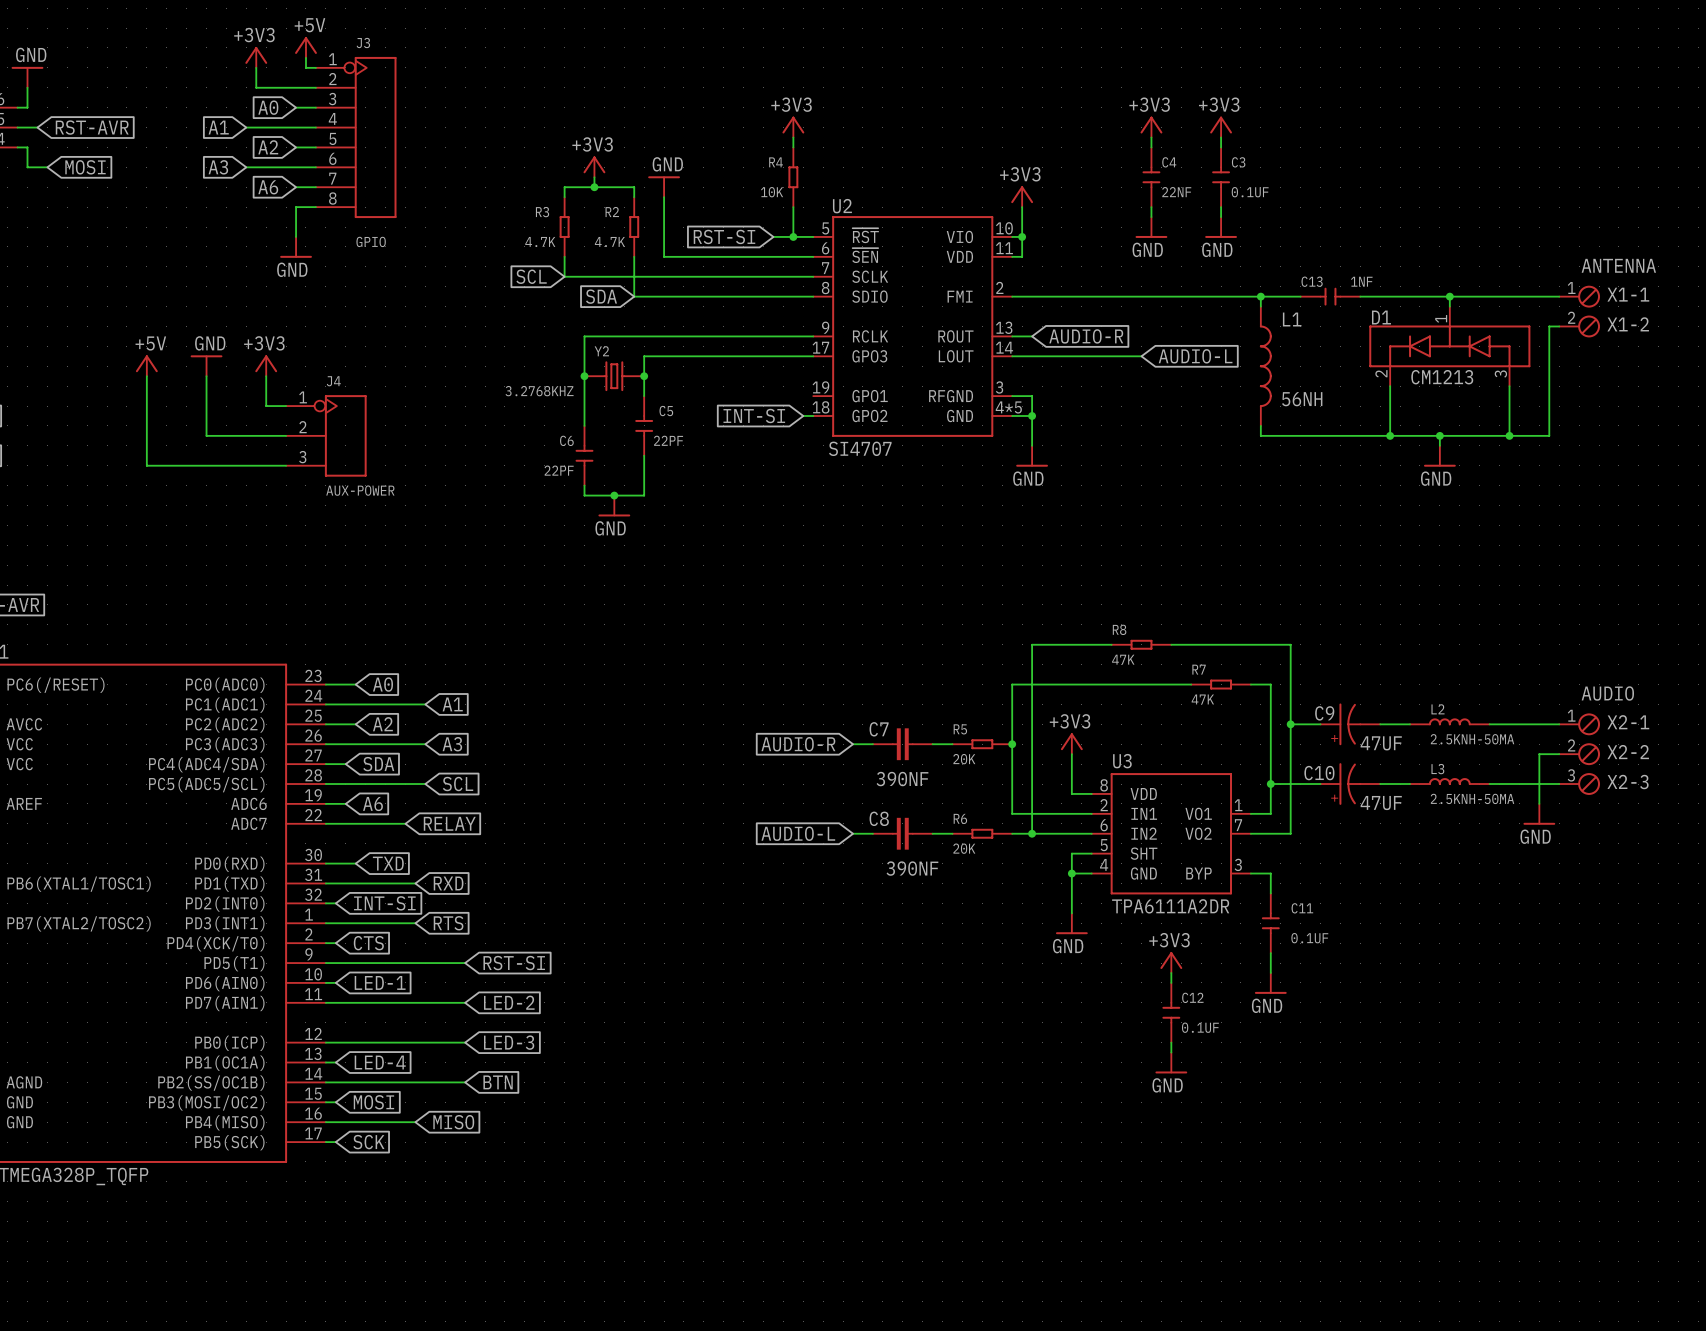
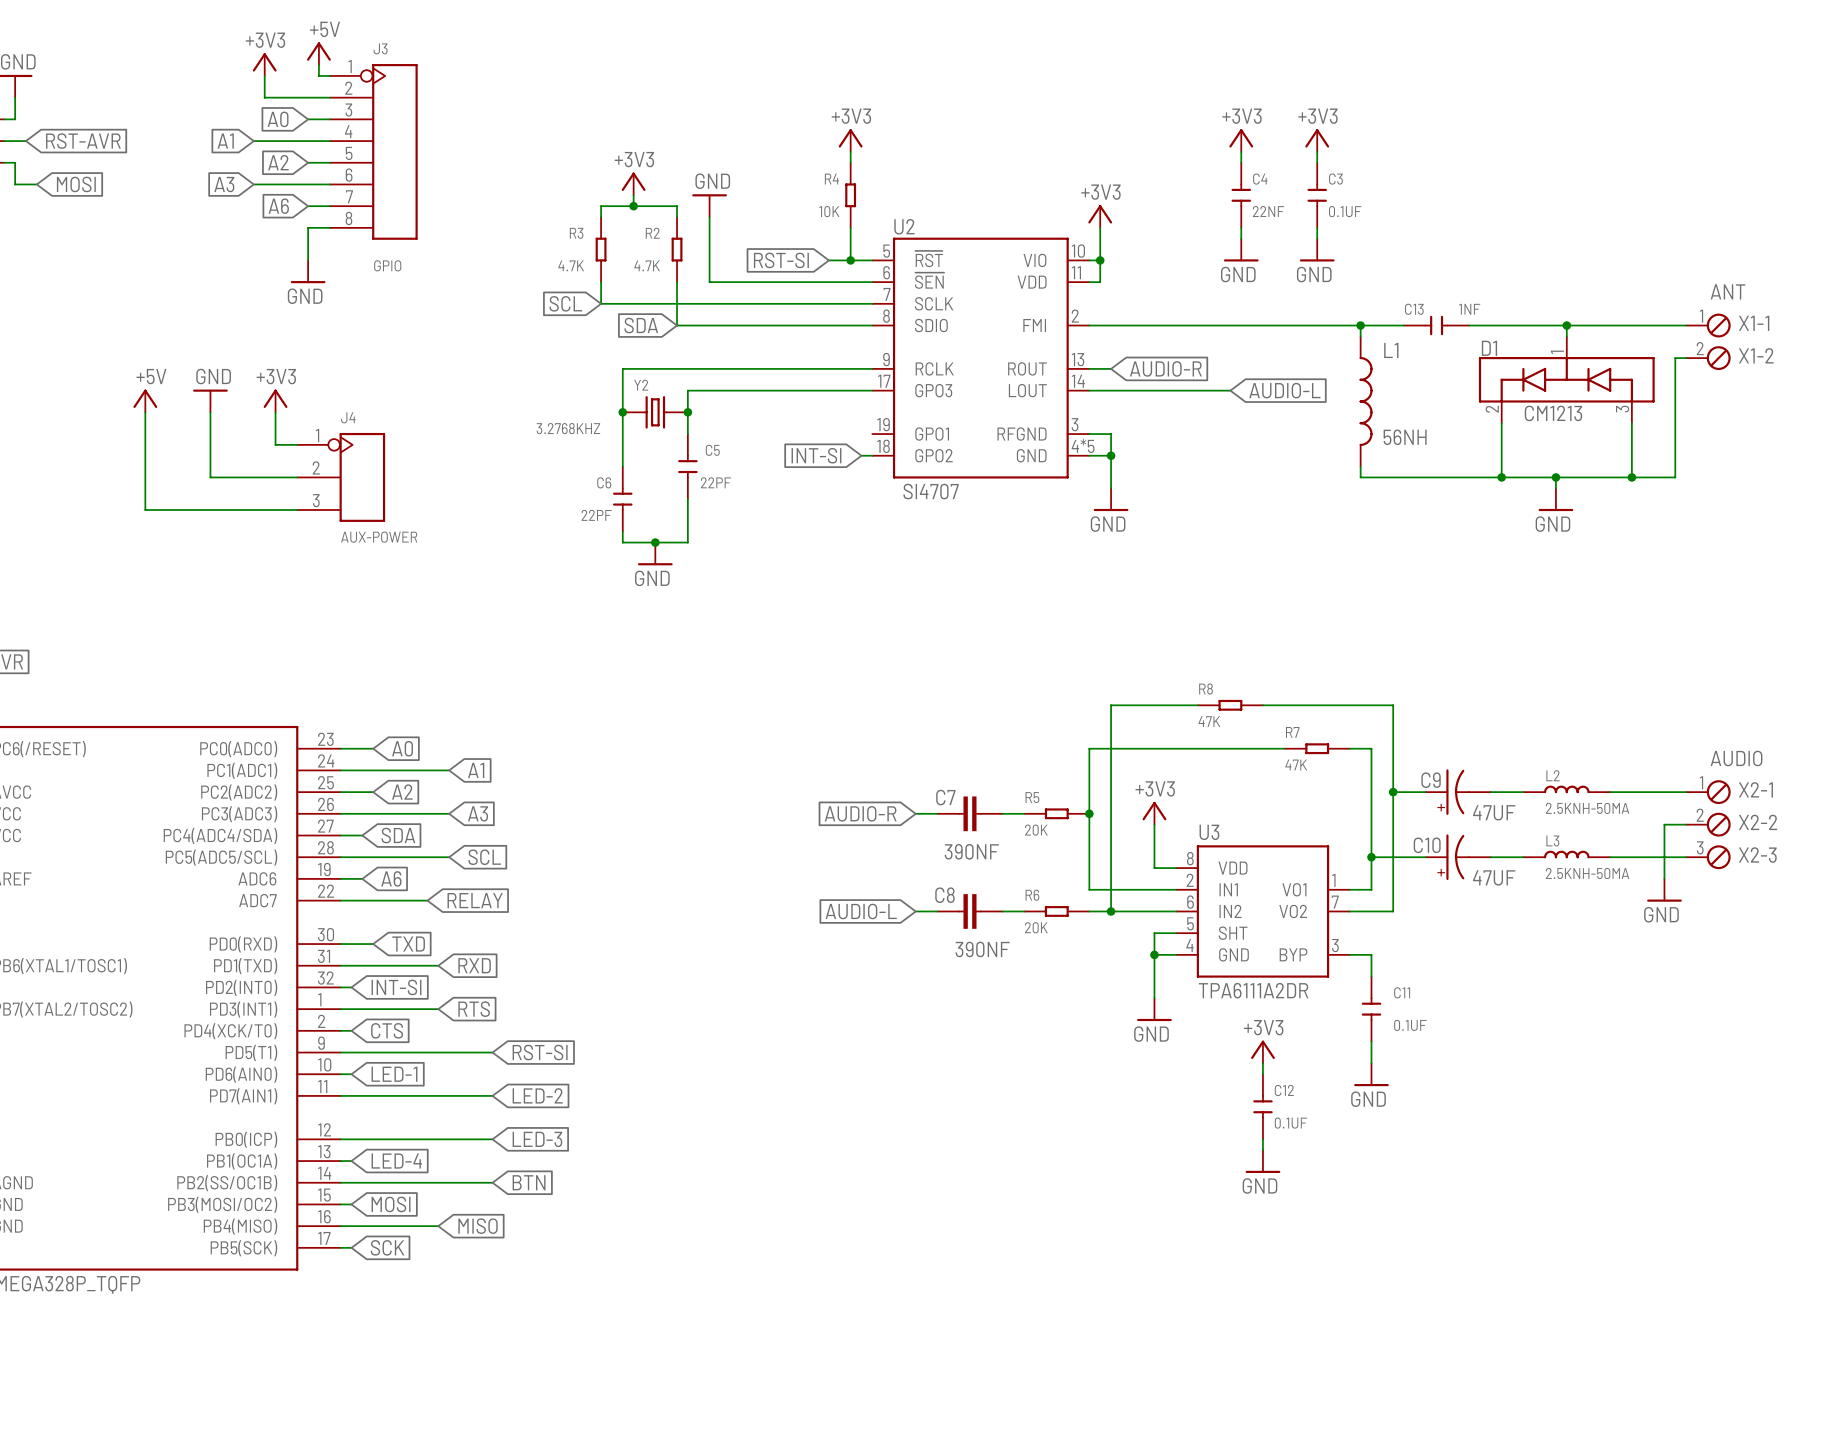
X1-2 value: ANTENNA (1618, 265) -> ANT (1728, 291)

